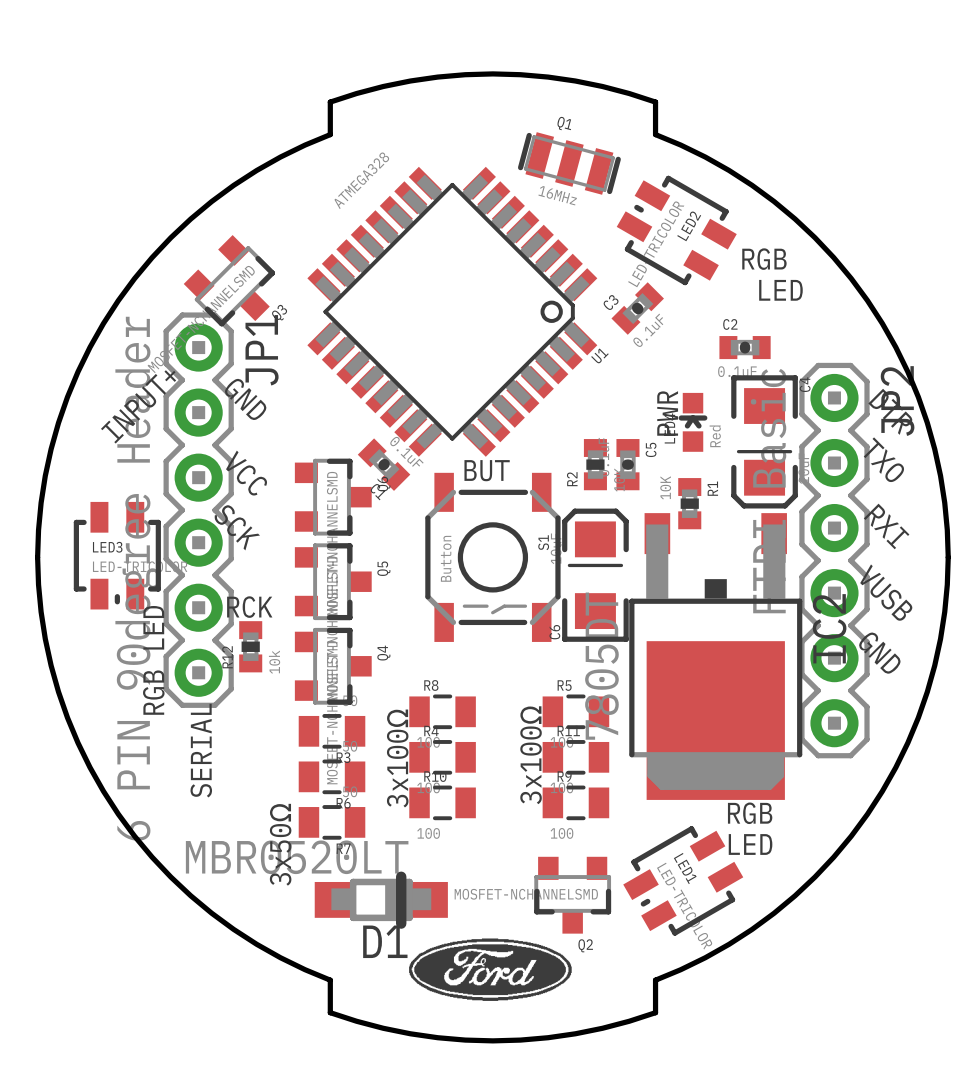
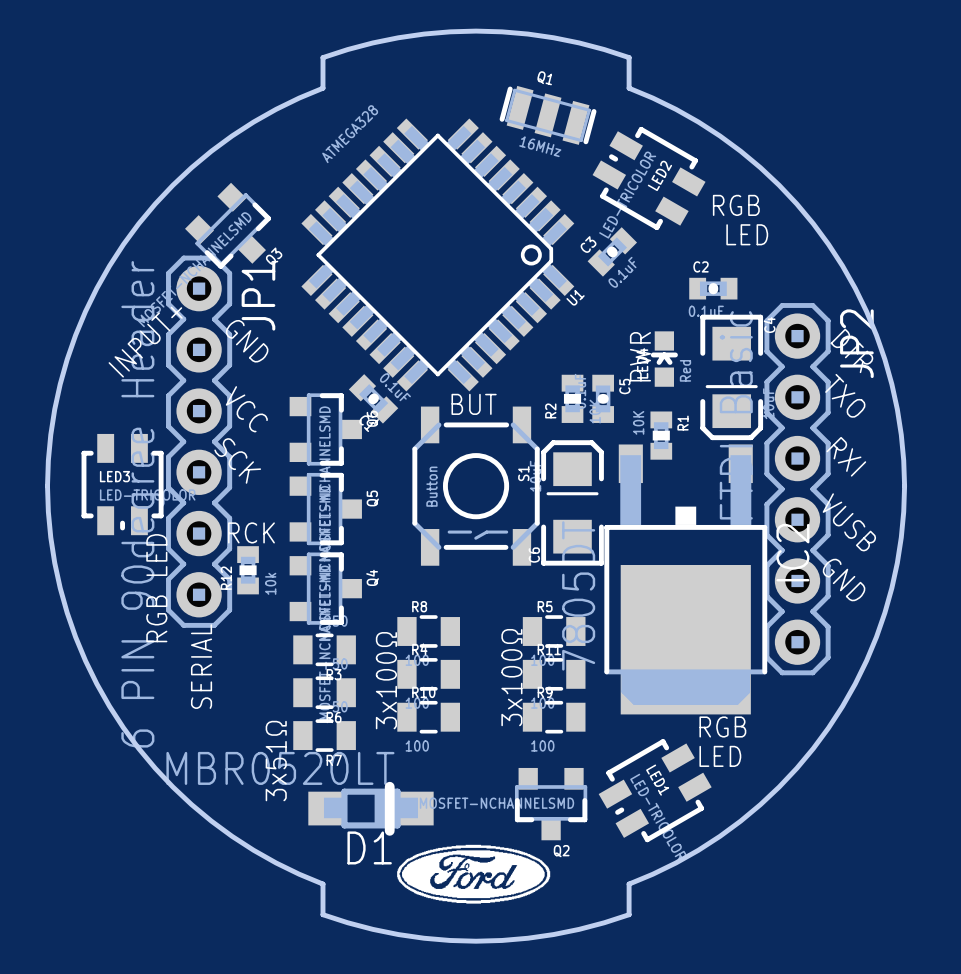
text: 3x50Ω (280, 844) -> 3x51Ω (276, 761)

